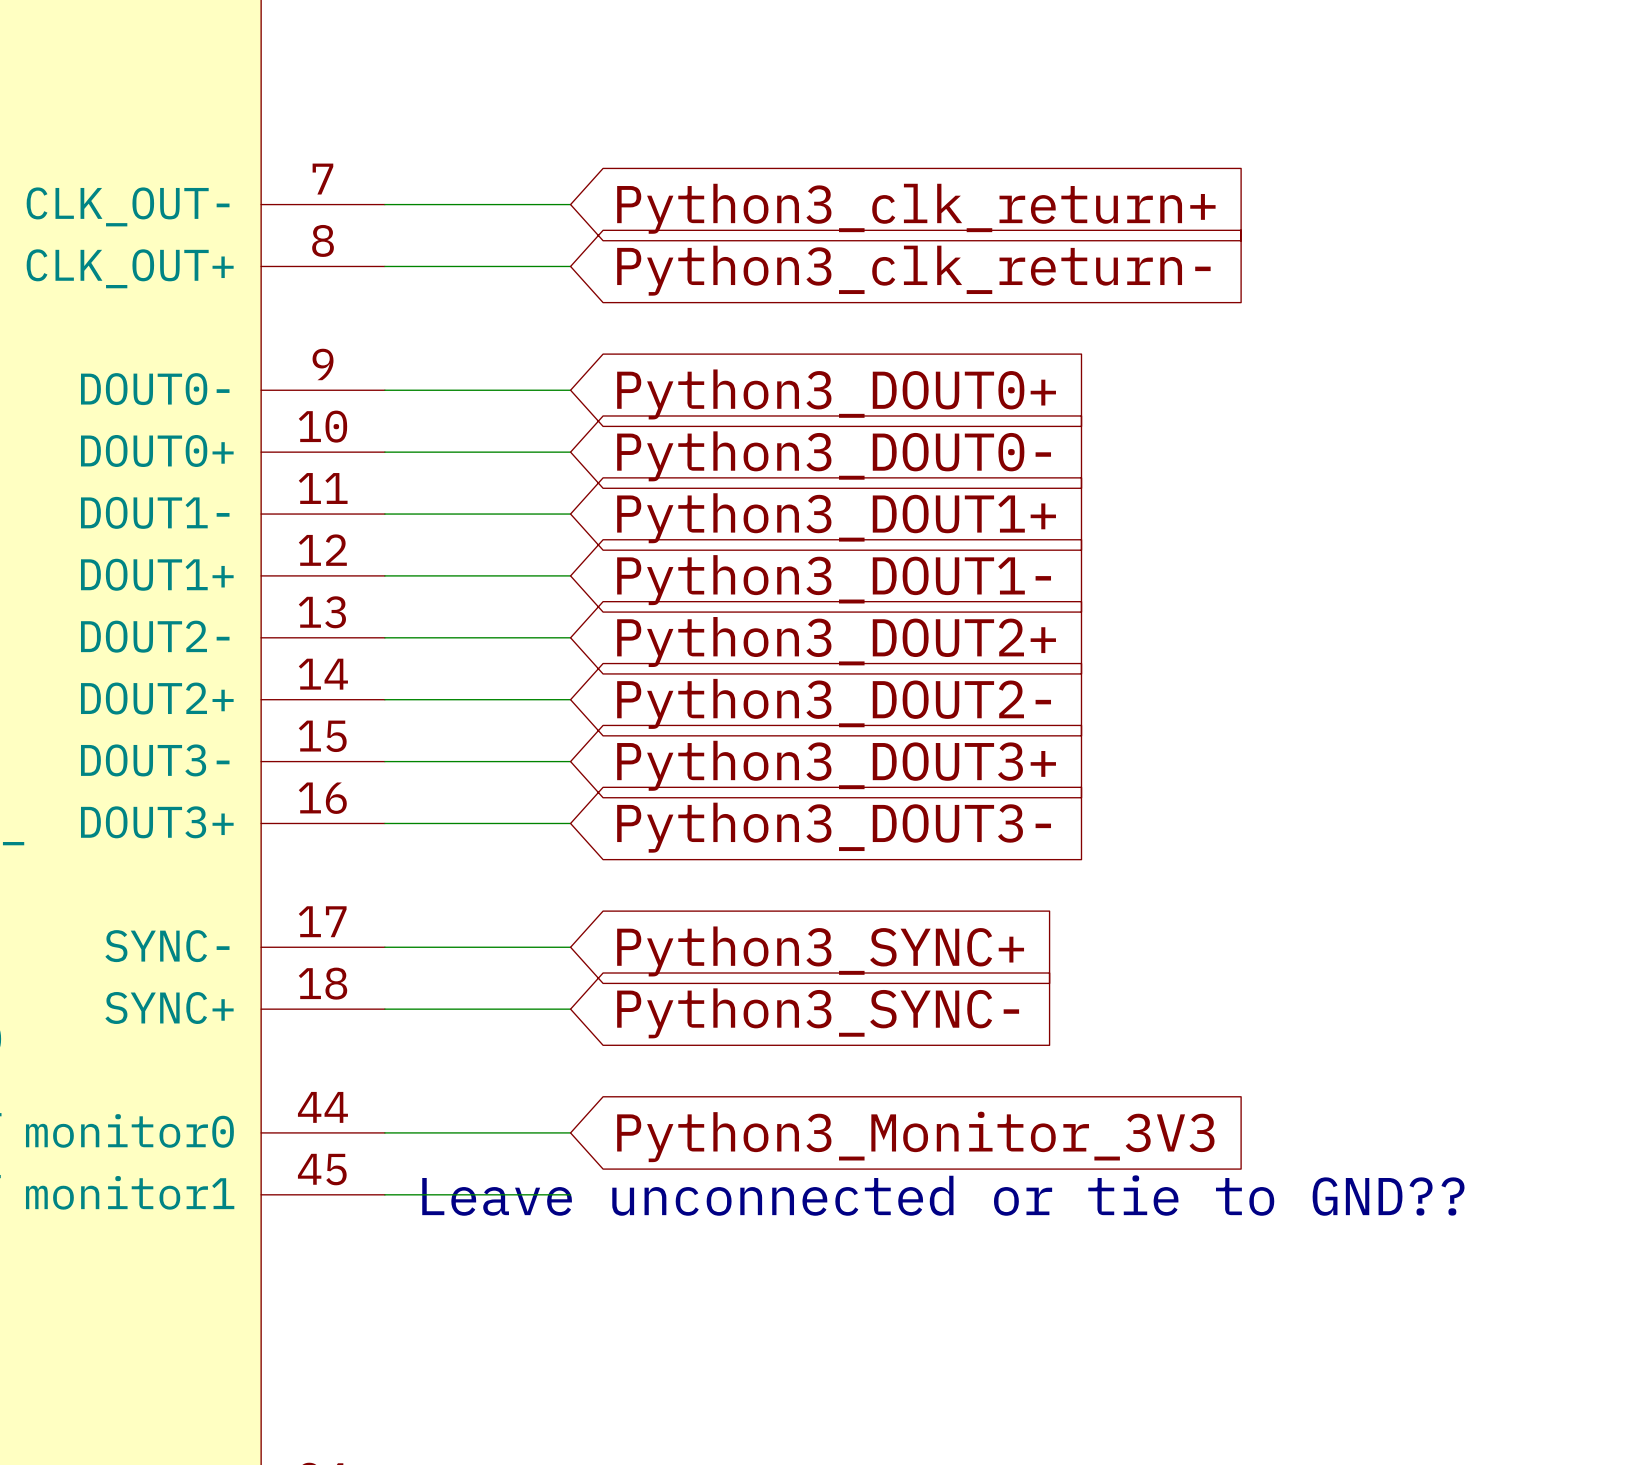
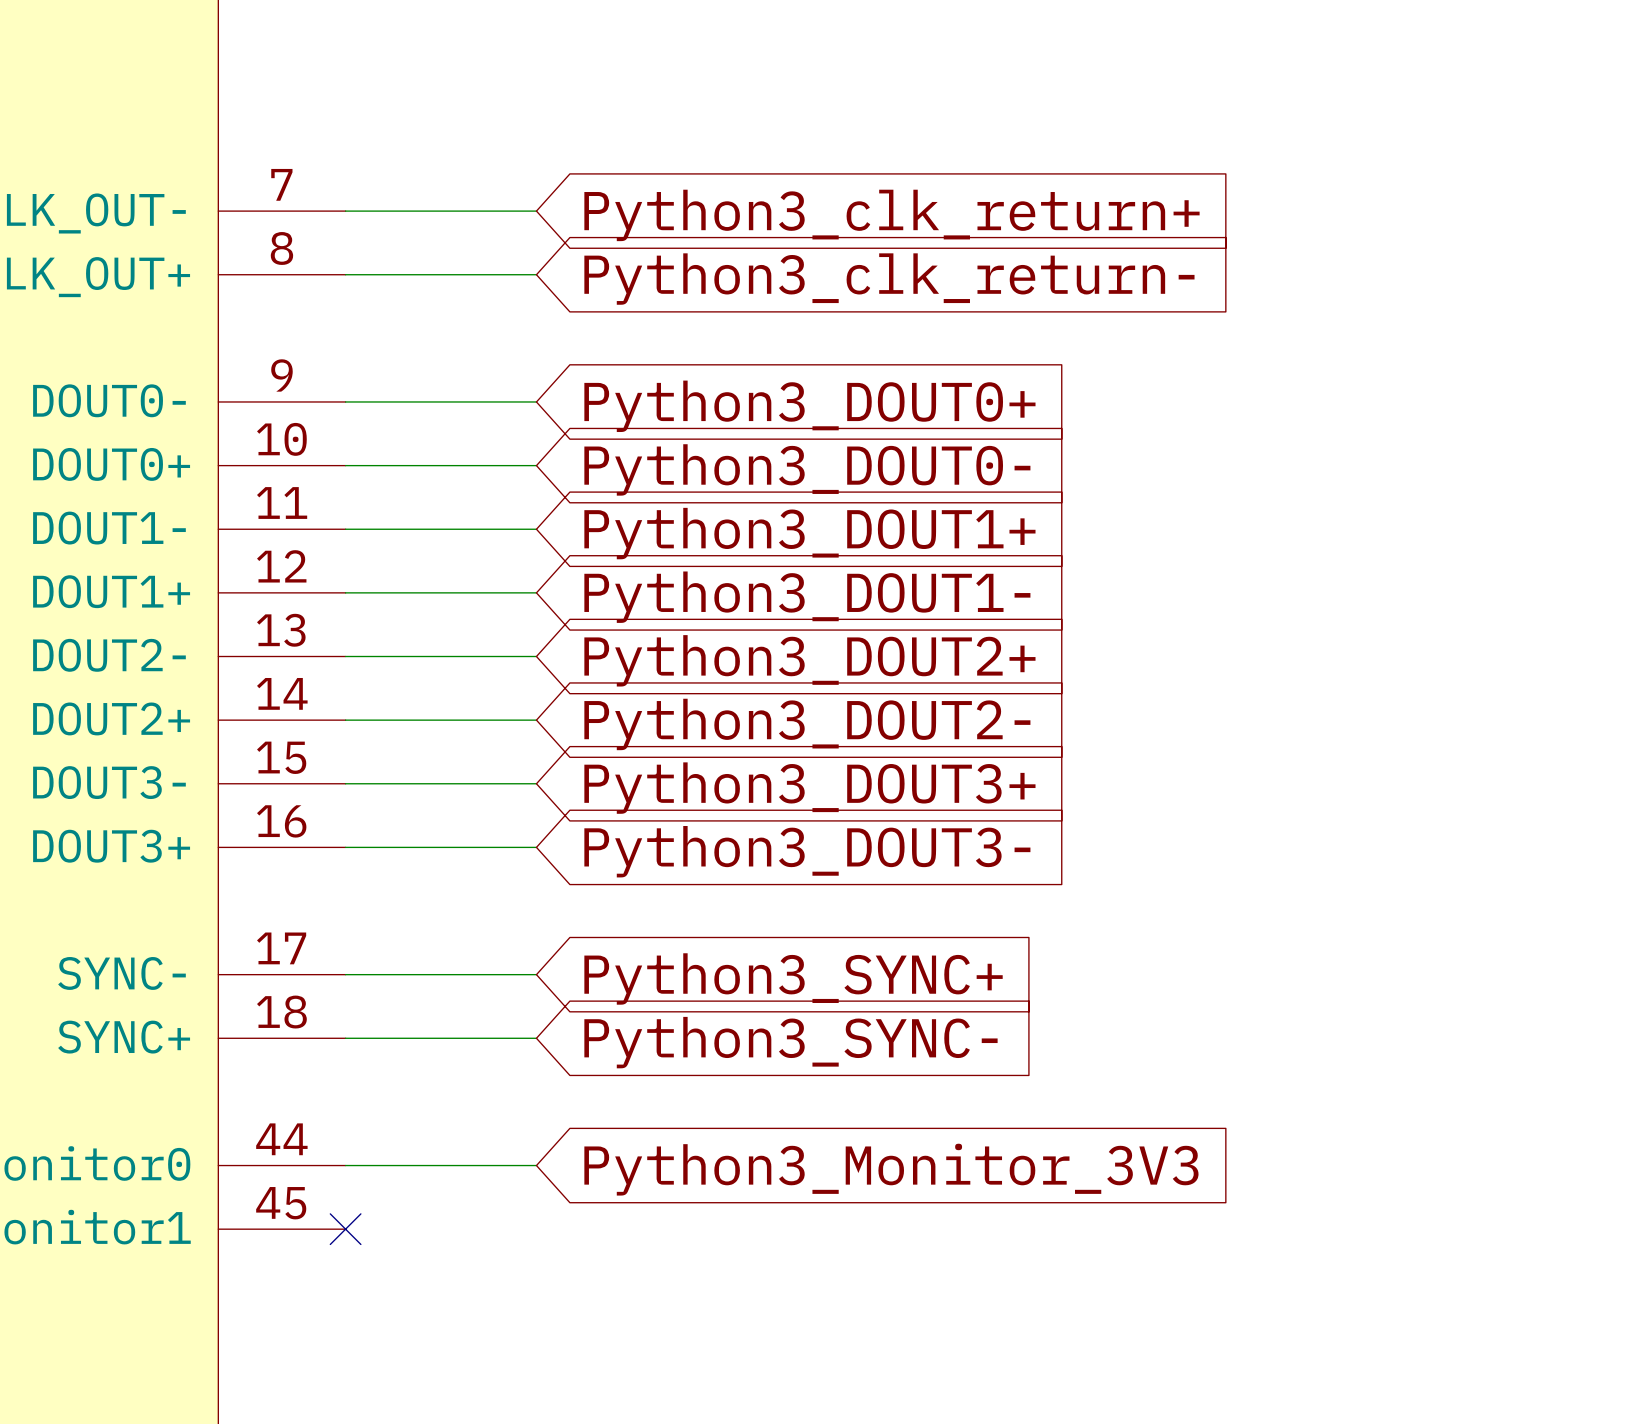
wire: (384, 1194) (570, 1194) -> none
no-connect mark: none -> (345, 1229)
text: Leave unconnected or tie to GND?? (943, 1195) -> none

